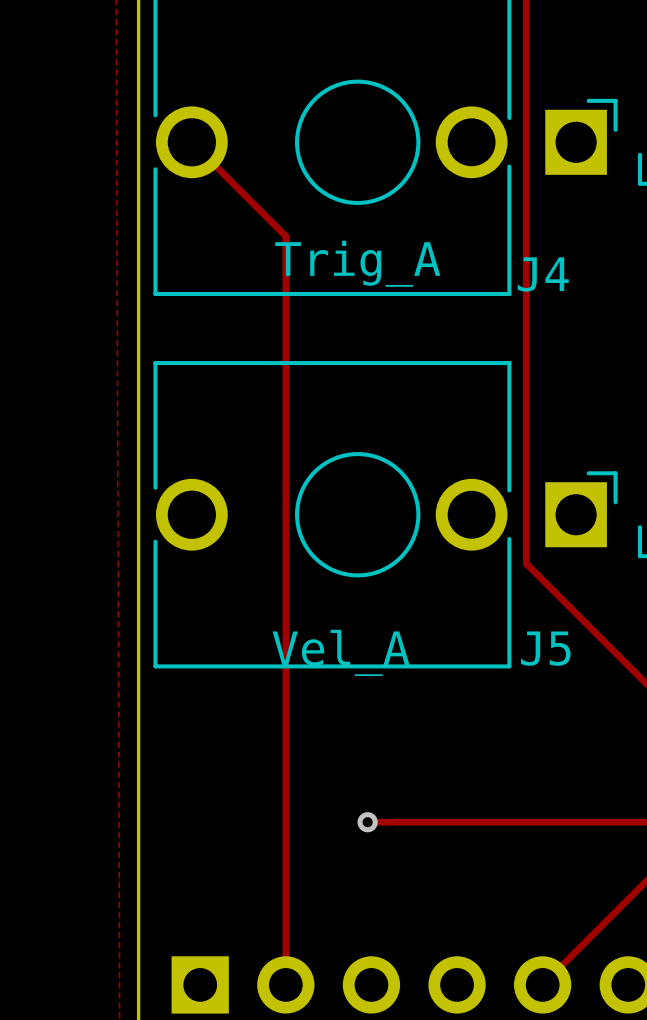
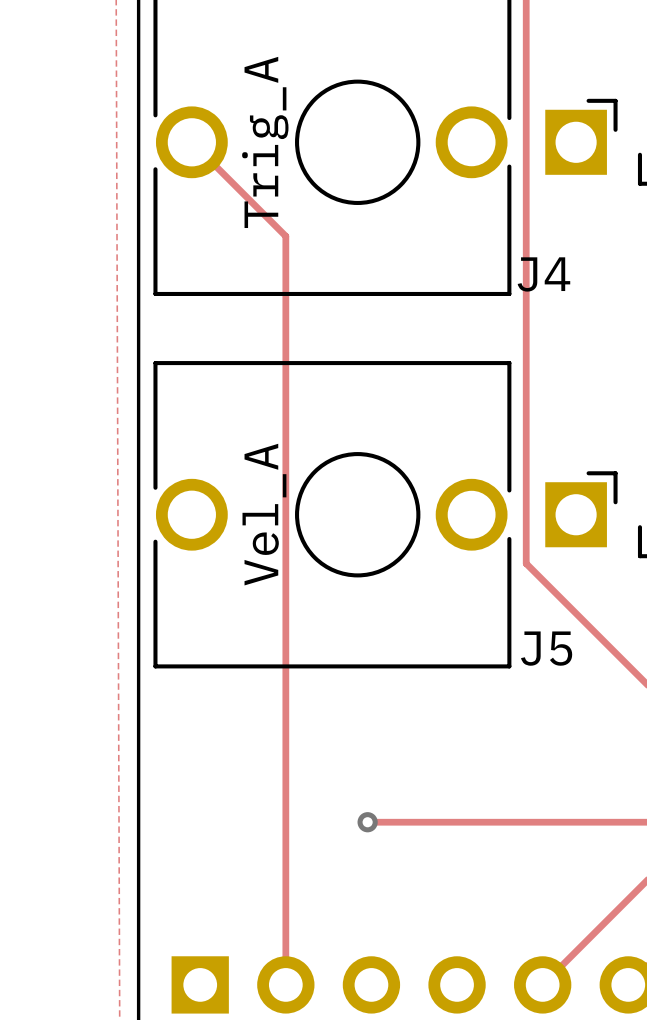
J4 value rotation: 0° (357, 263) -> 90° counterclockwise (265, 142)
J5 value rotation: 0° (341, 652) -> 90° counterclockwise (264, 514)

